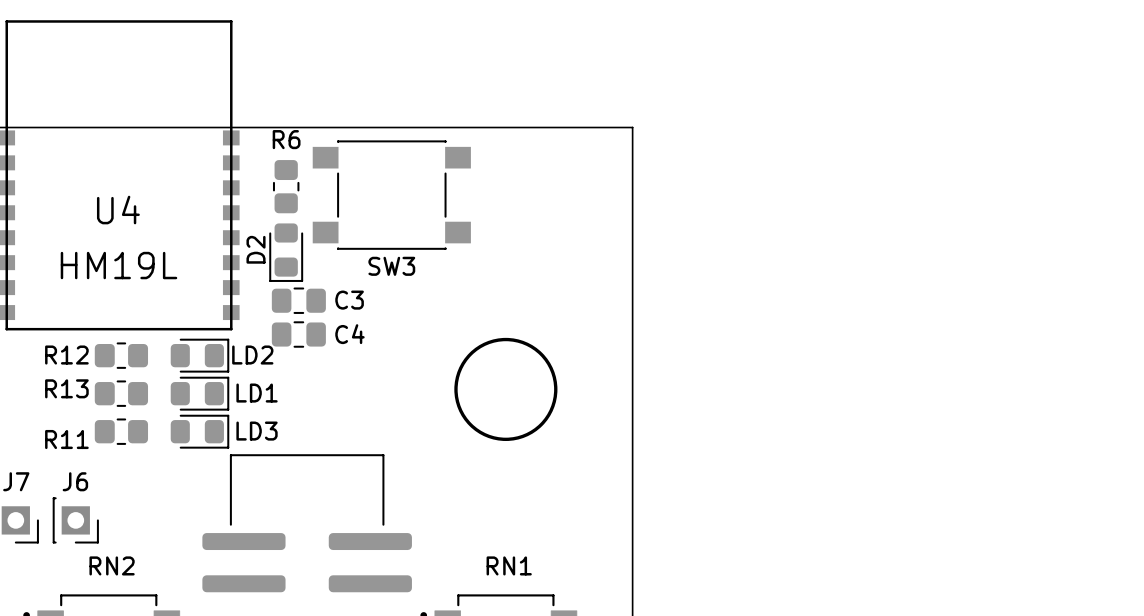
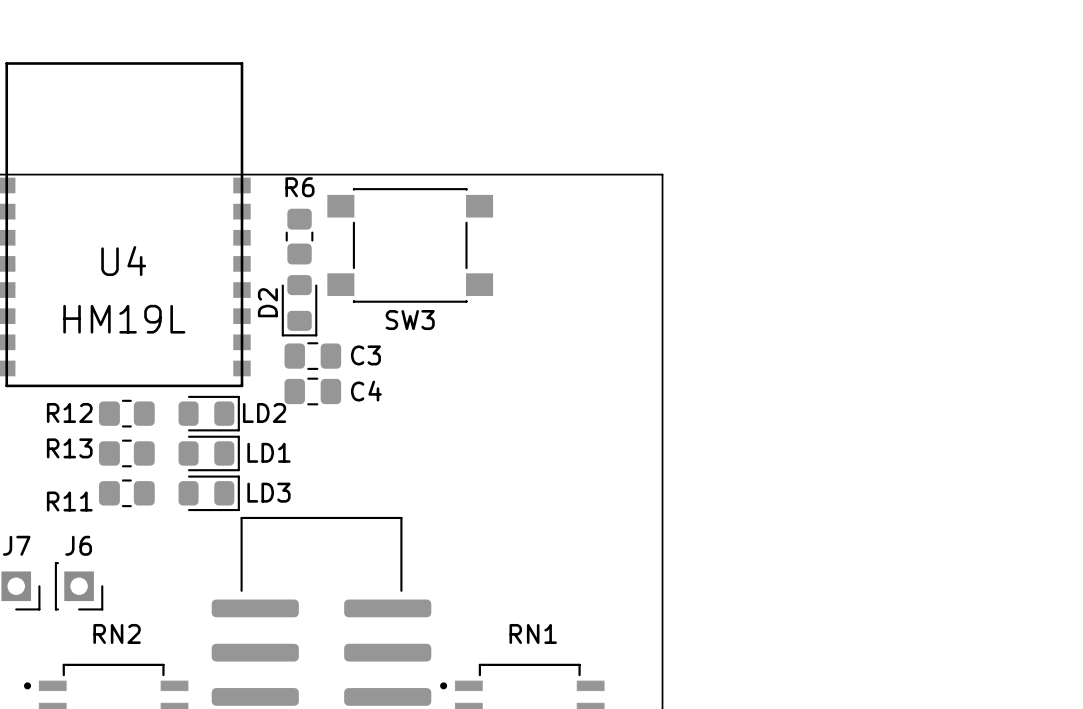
round board edge: [454, 337, 558, 442] -> none

